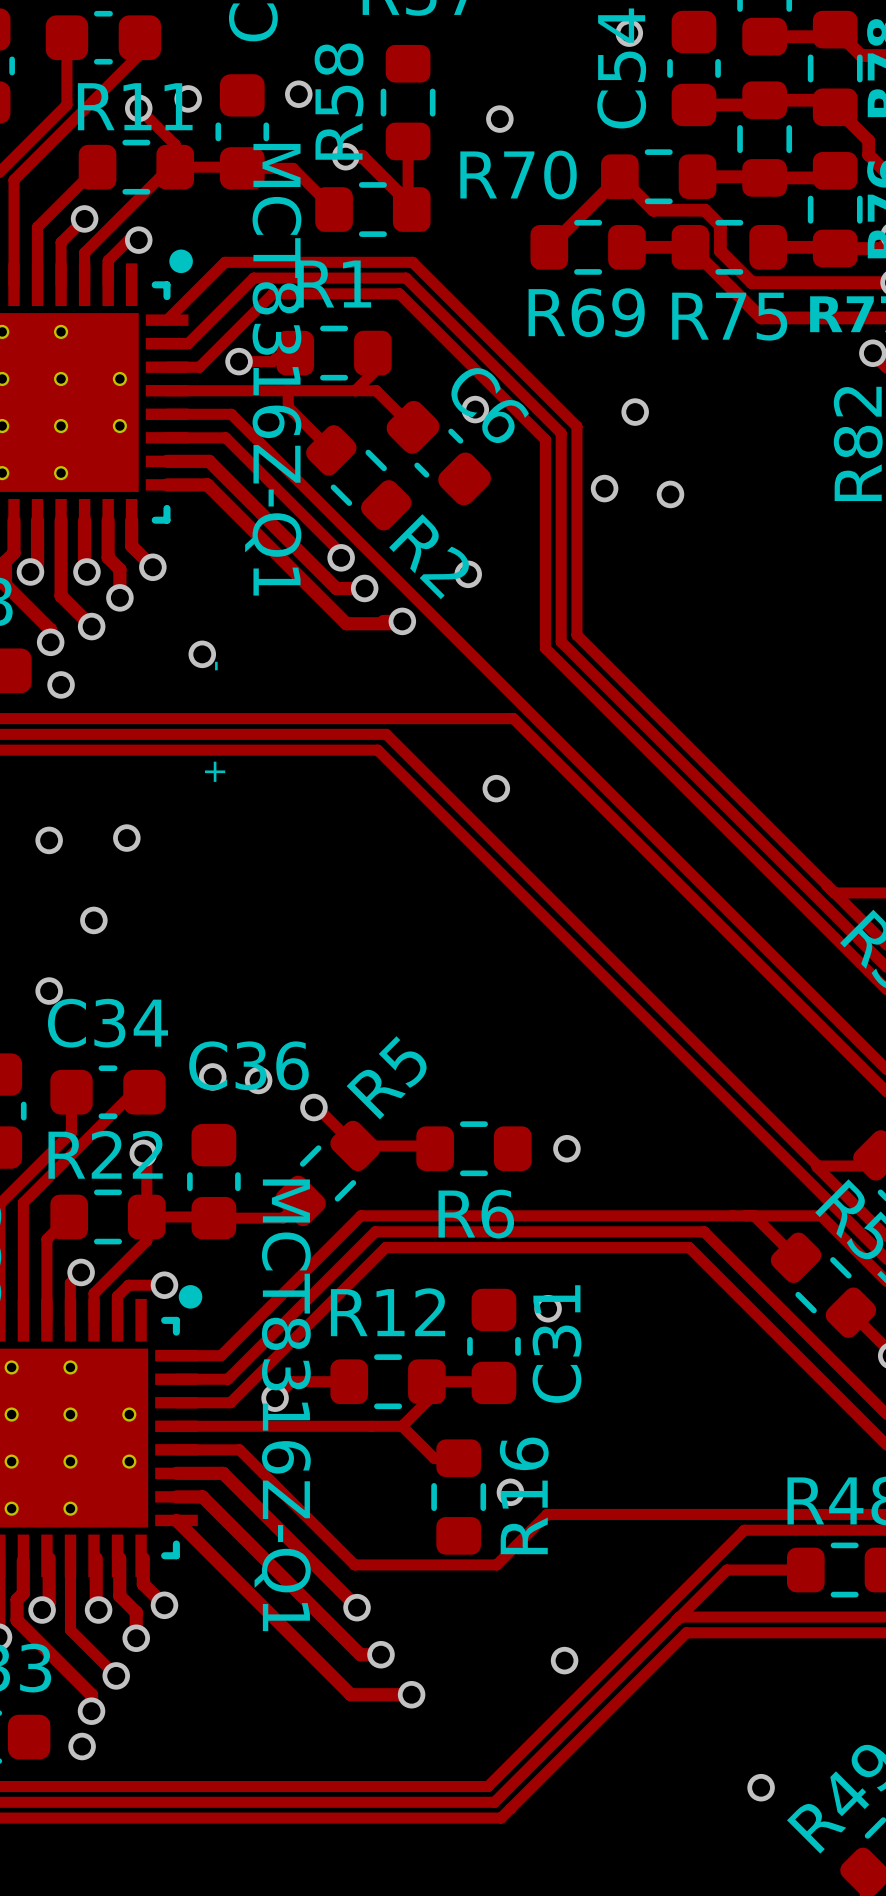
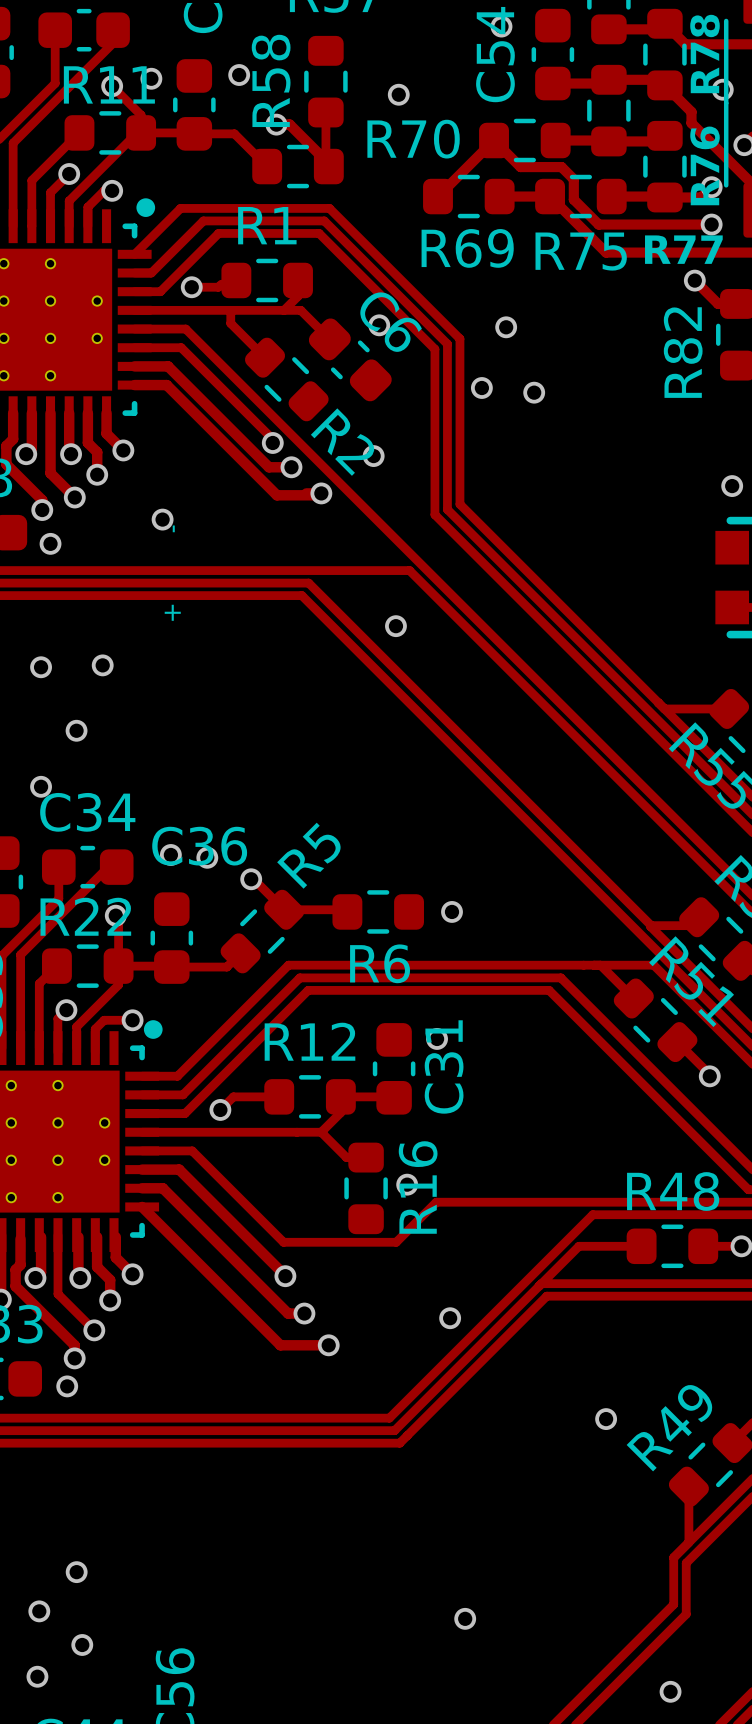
part text: MCT8316Z-Q1 (273, 369) -> none
part text: MCT8316Z-Q1 (282, 1405) -> none

